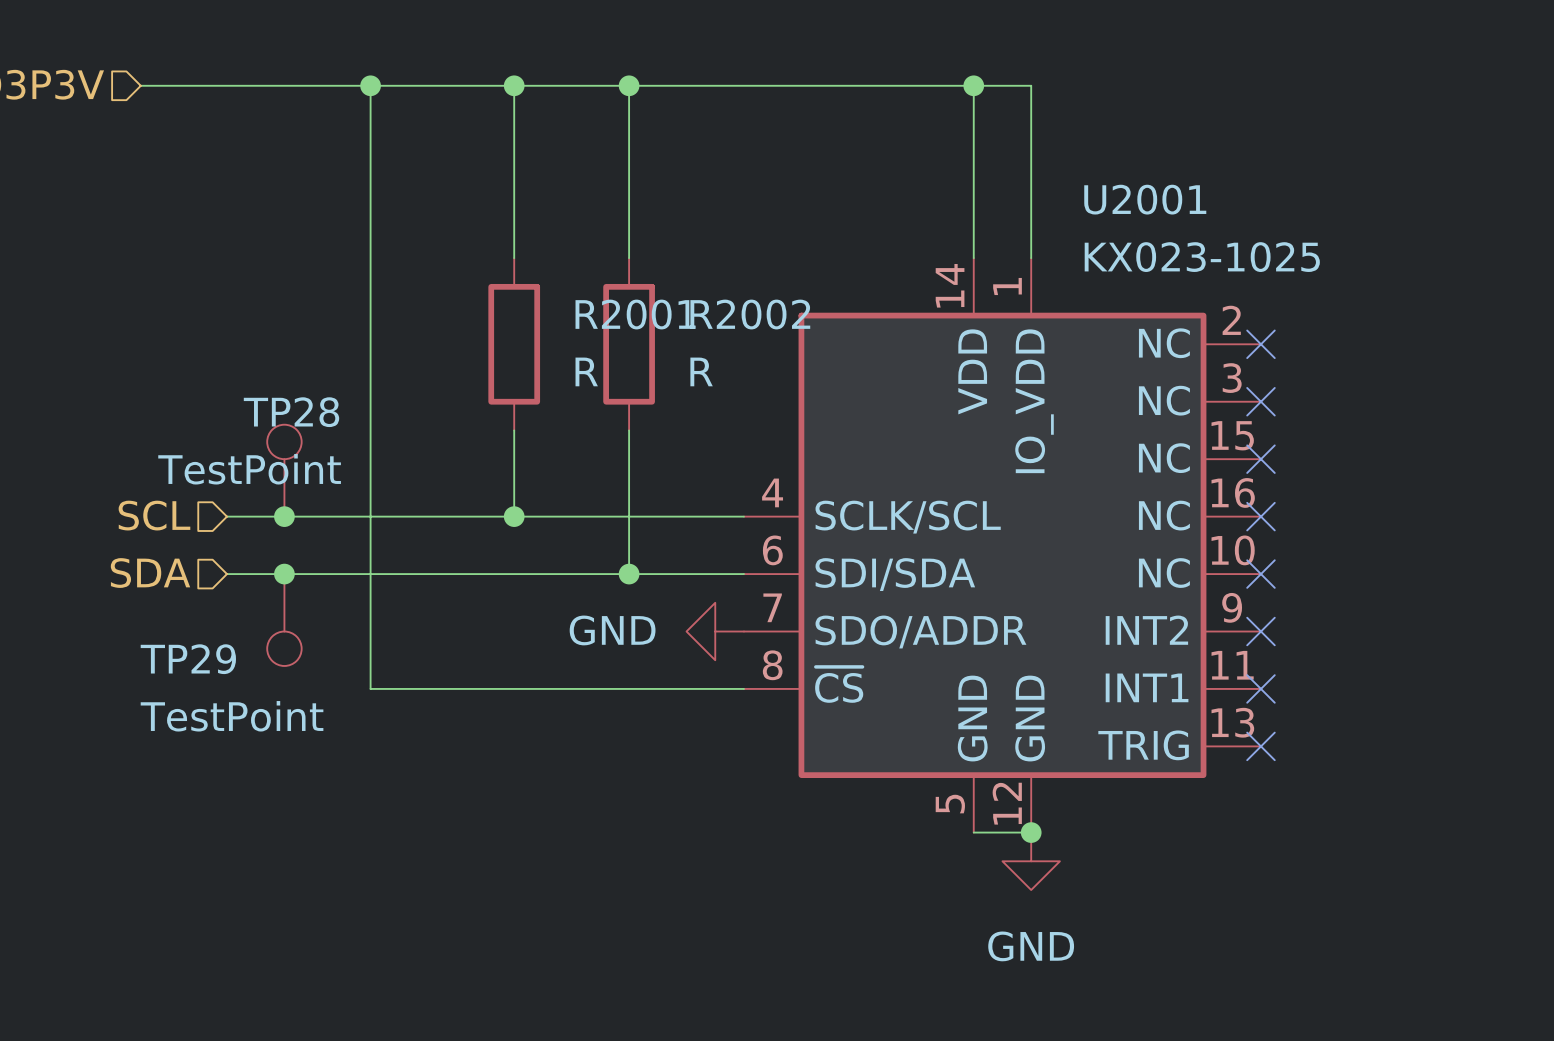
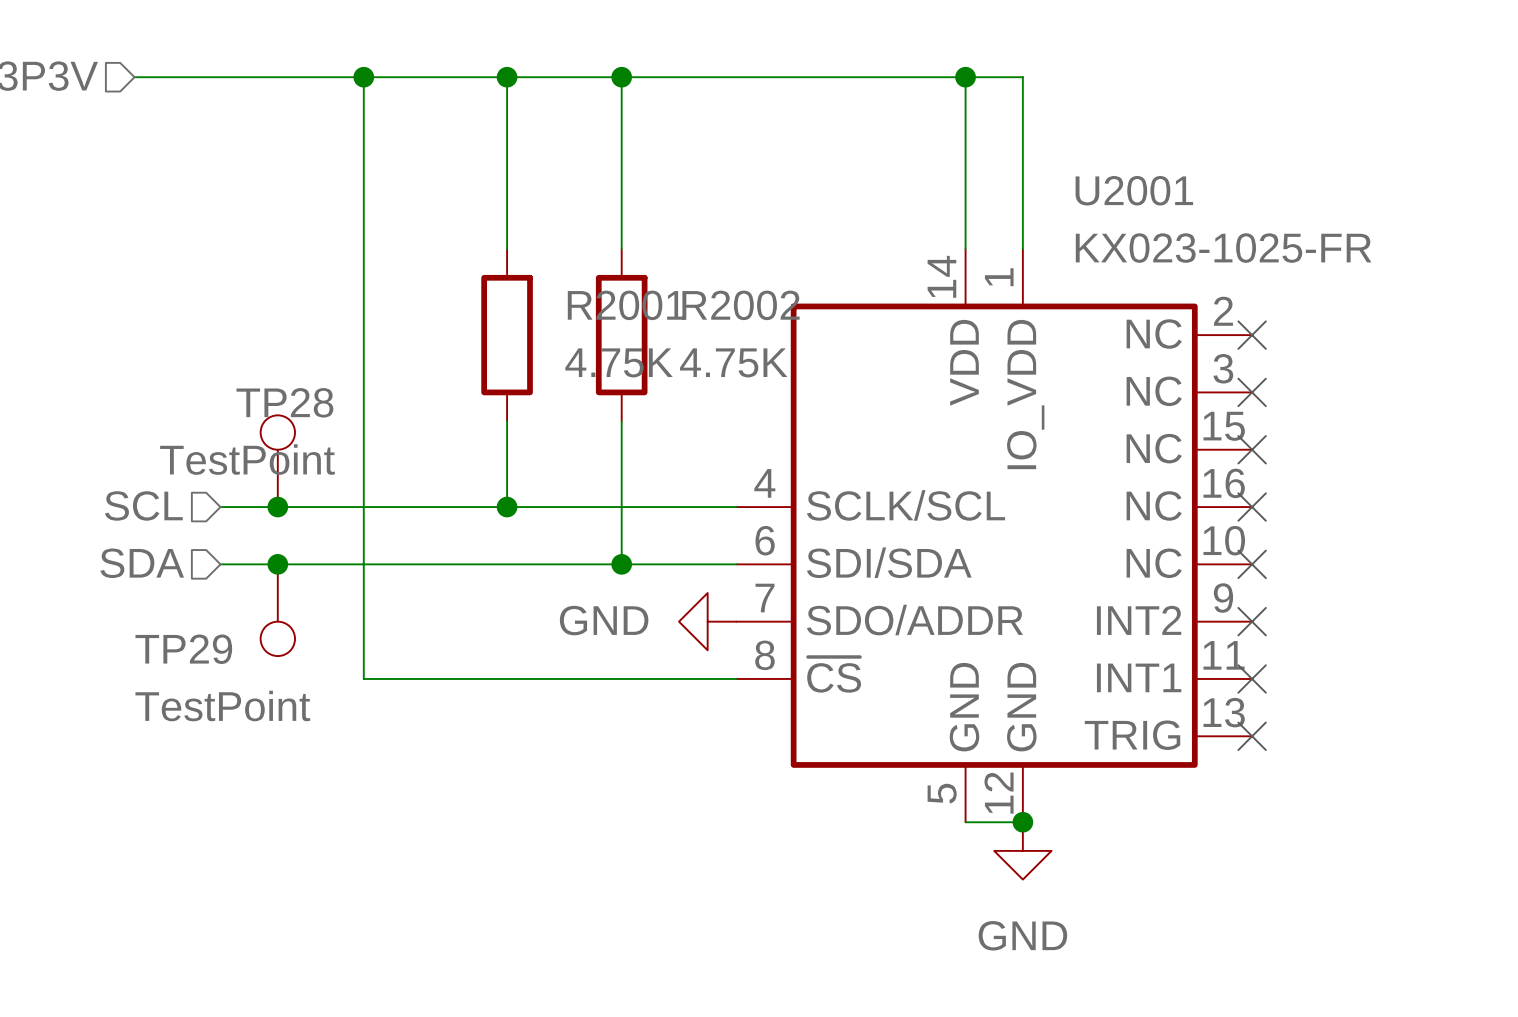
U2001 value: KX023-1025 (1202, 257) -> KX023-1025-FR (1223, 248)
R2001 value: R (586, 371) -> 4.75K (619, 362)
R2002 value: R (701, 371) -> 4.75K (733, 362)

